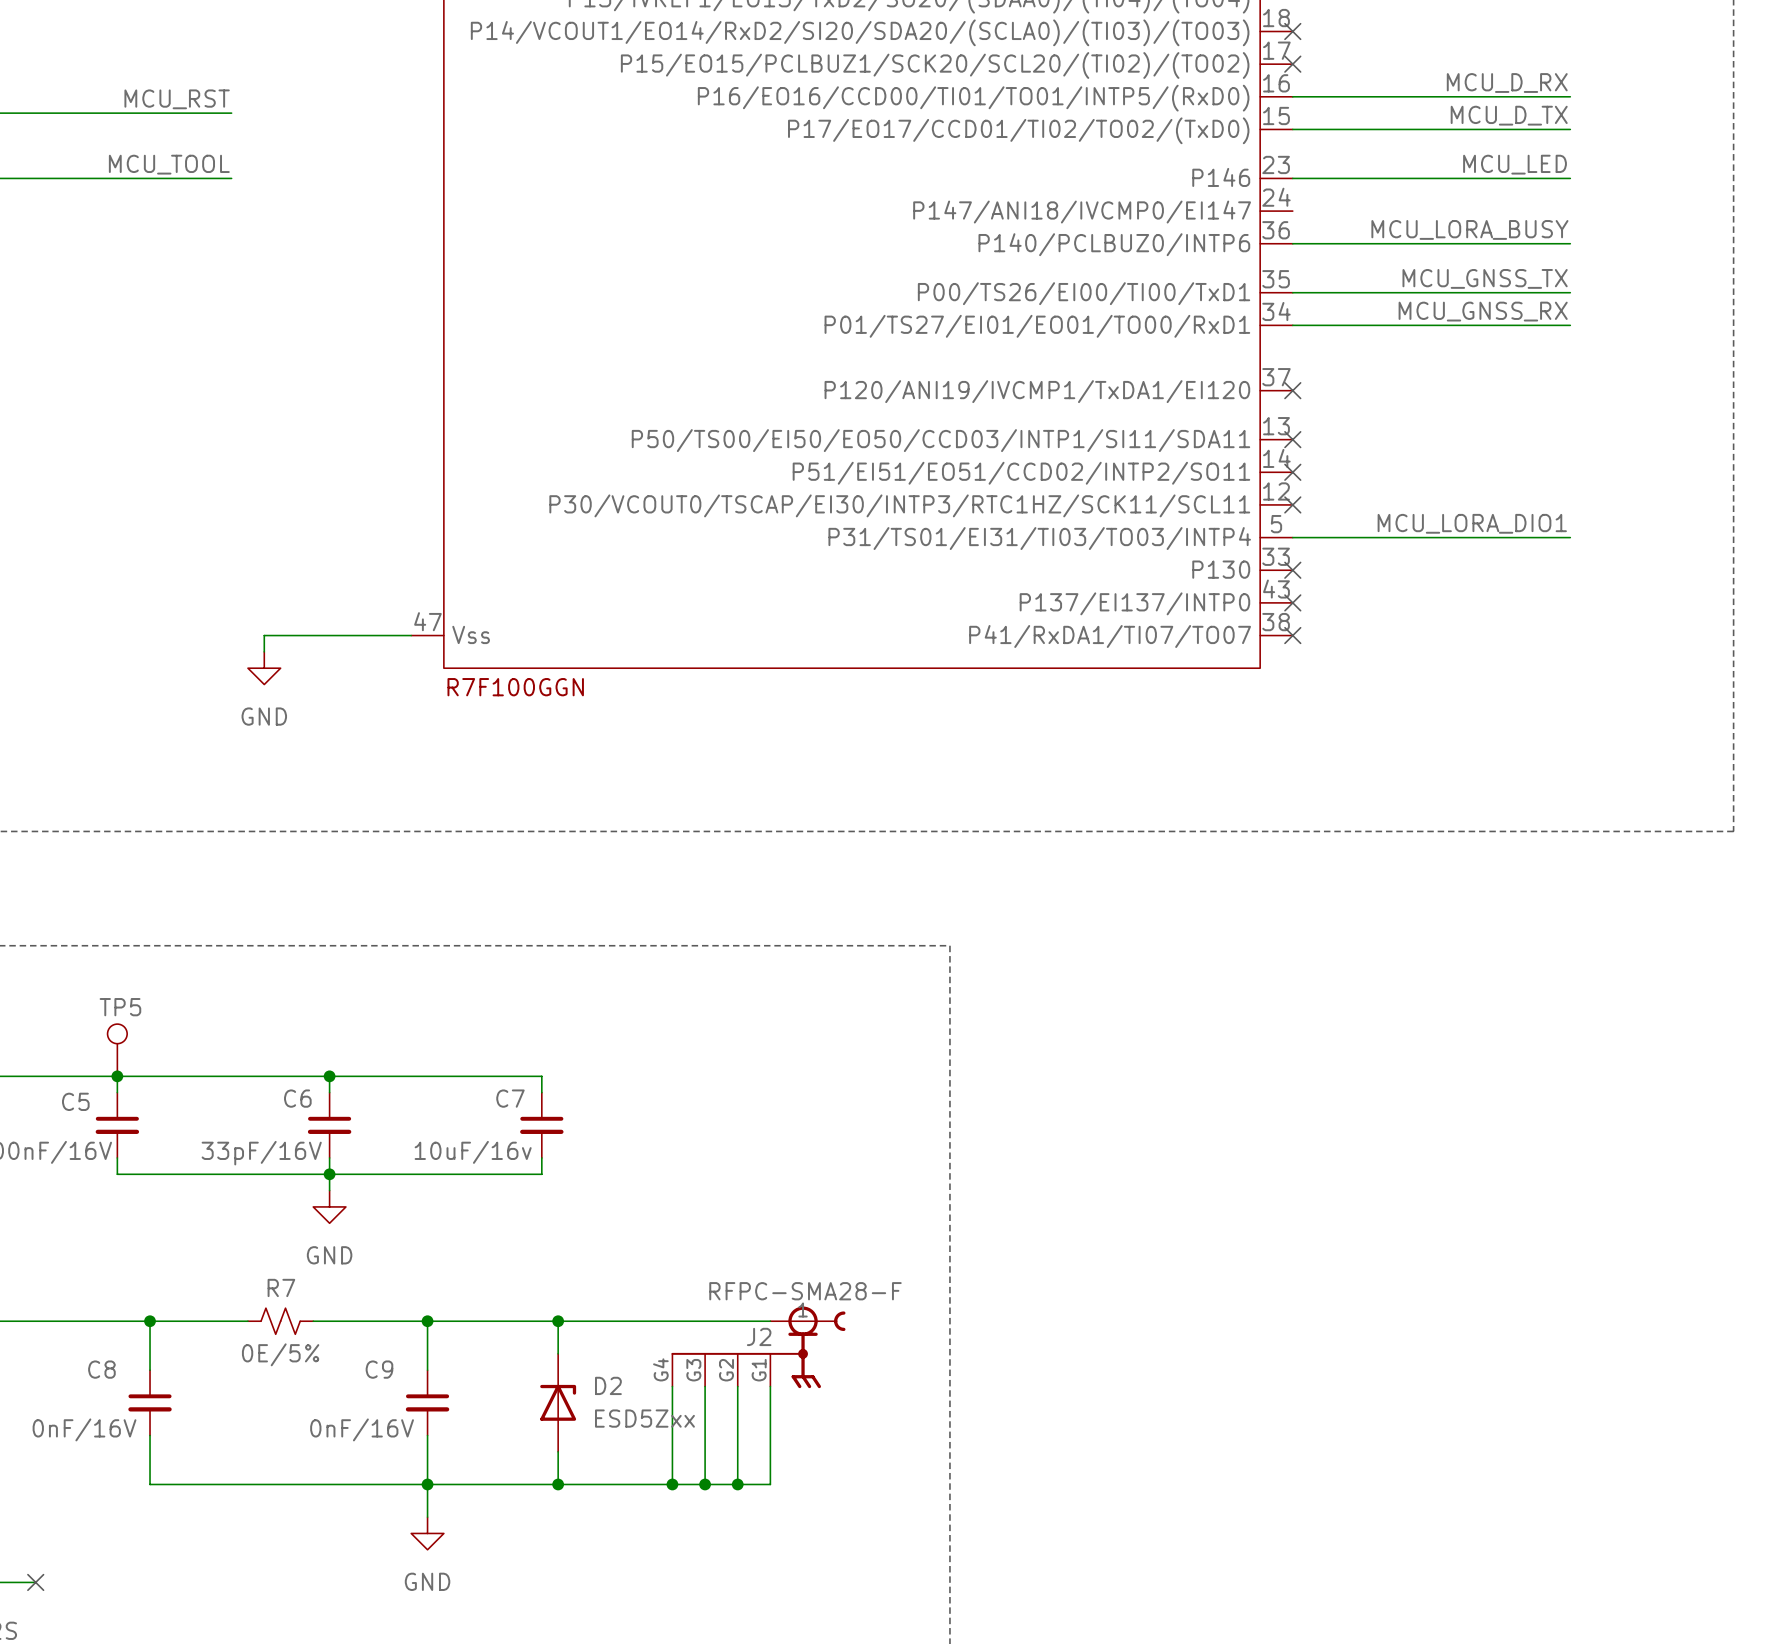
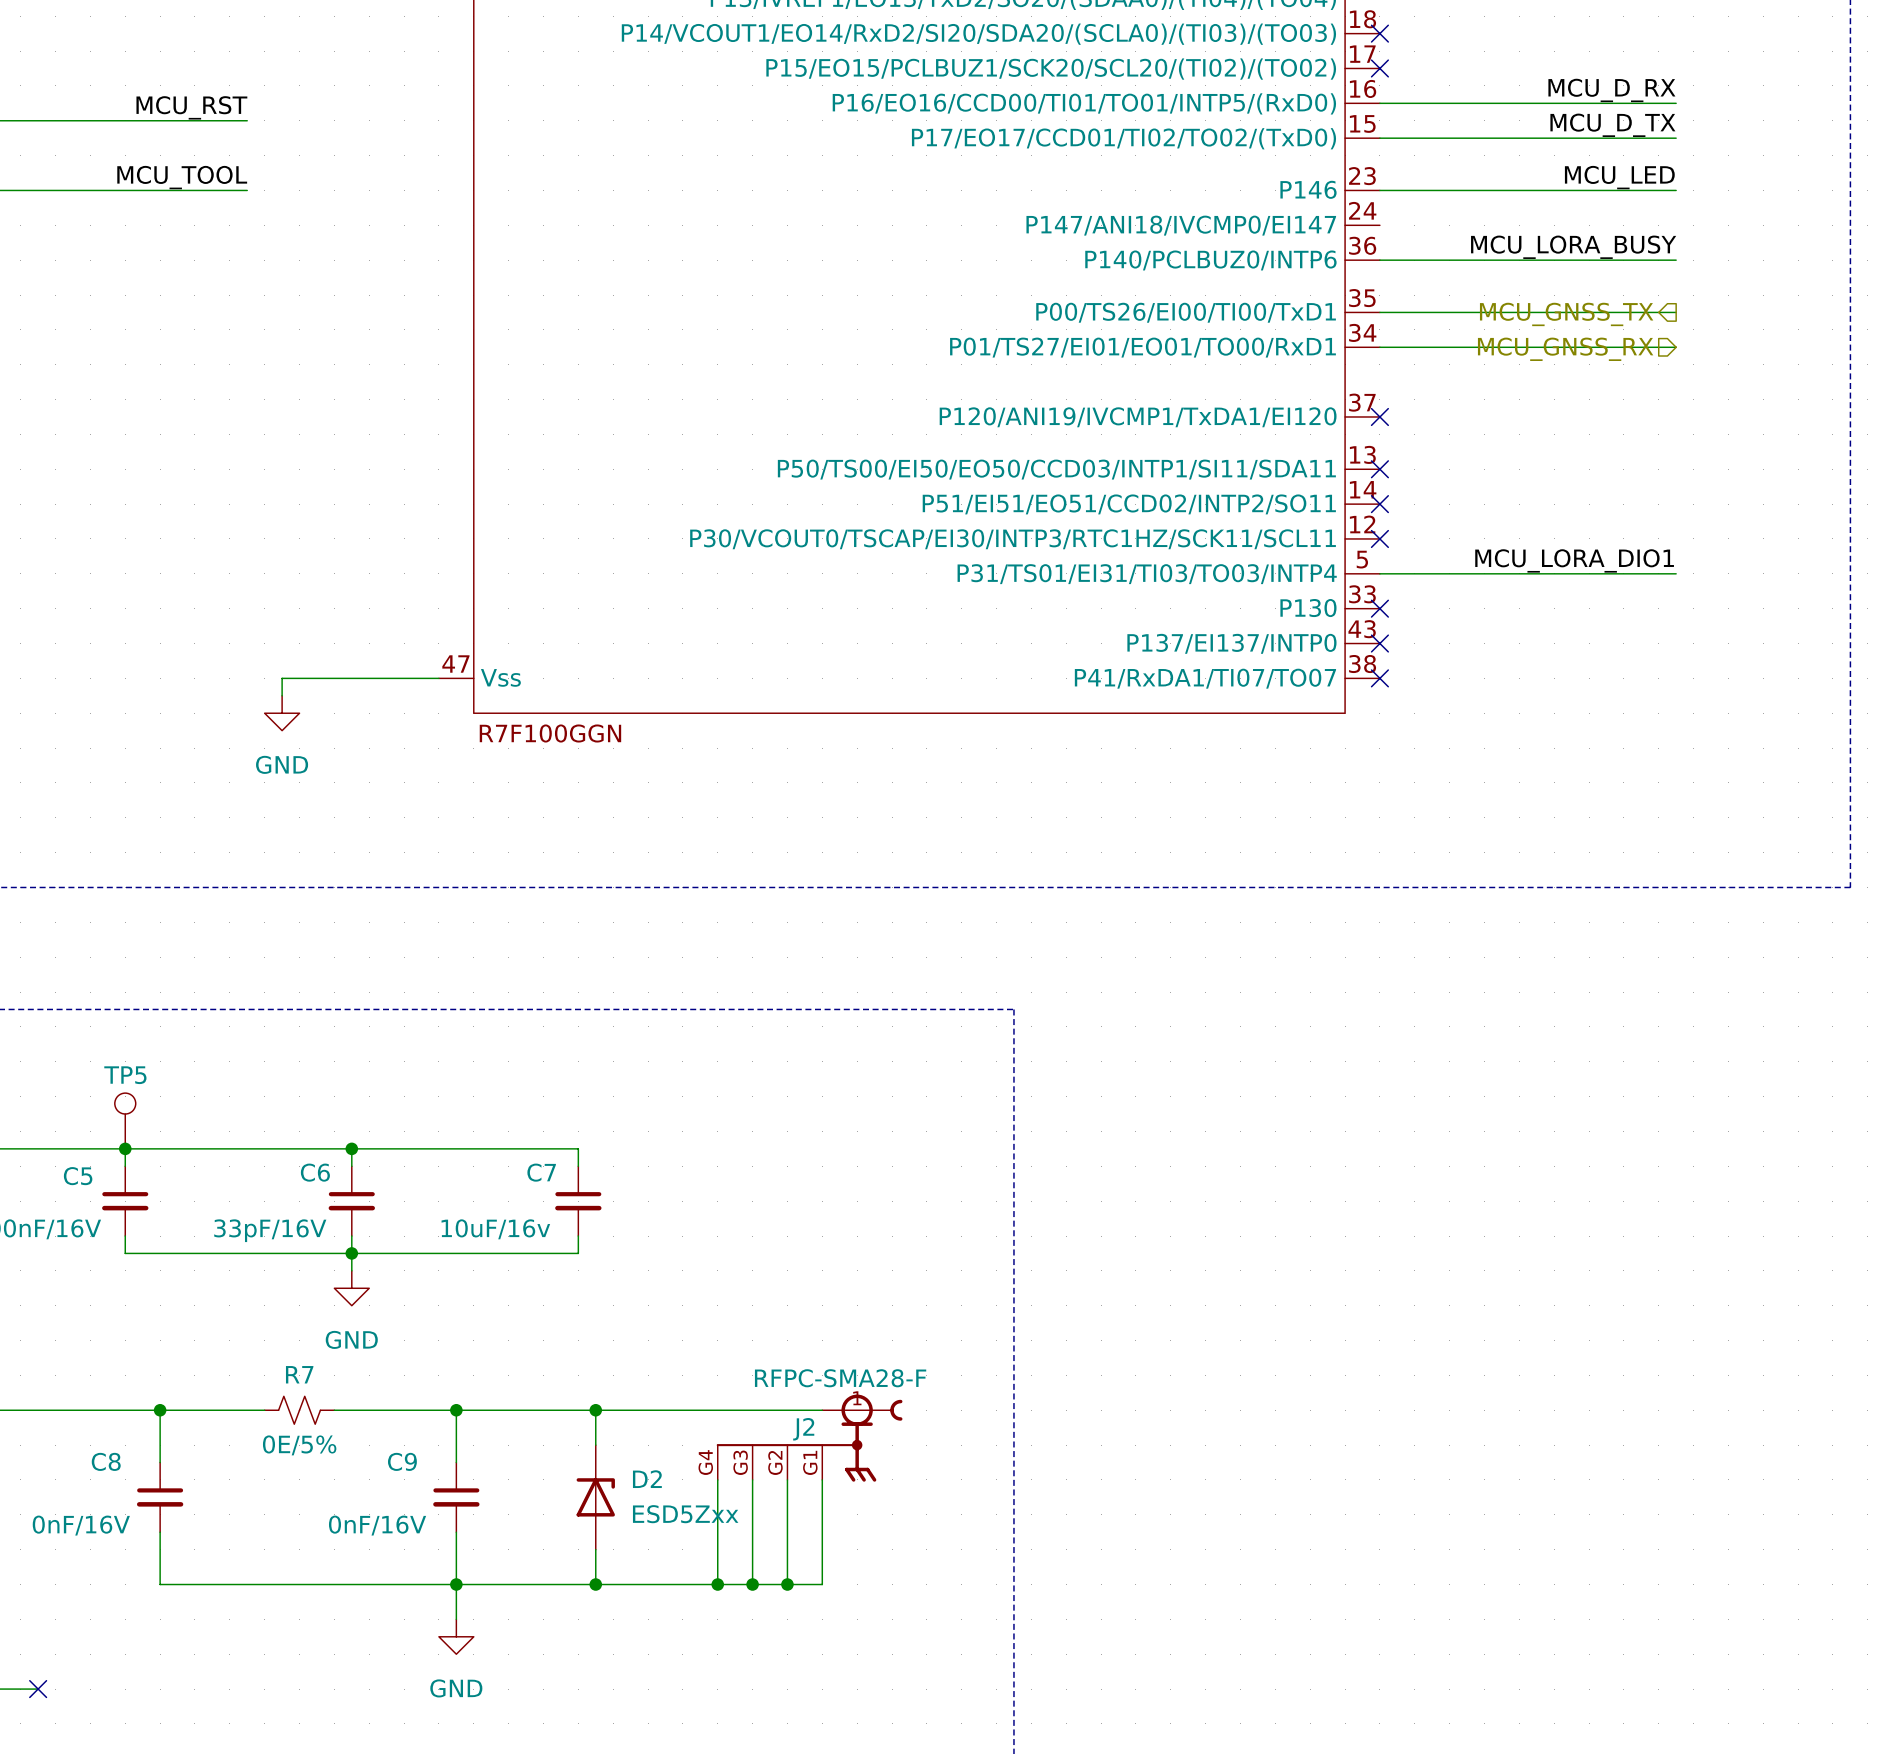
label: MCU_GNSS_TX (1485, 278) -> none
hierarchical label: none -> MCU_GNSS_TX (1566, 314)
label: MCU_GNSS_RX (1483, 311) -> none
hierarchical label: none -> MCU_GNSS_RX (1565, 349)

